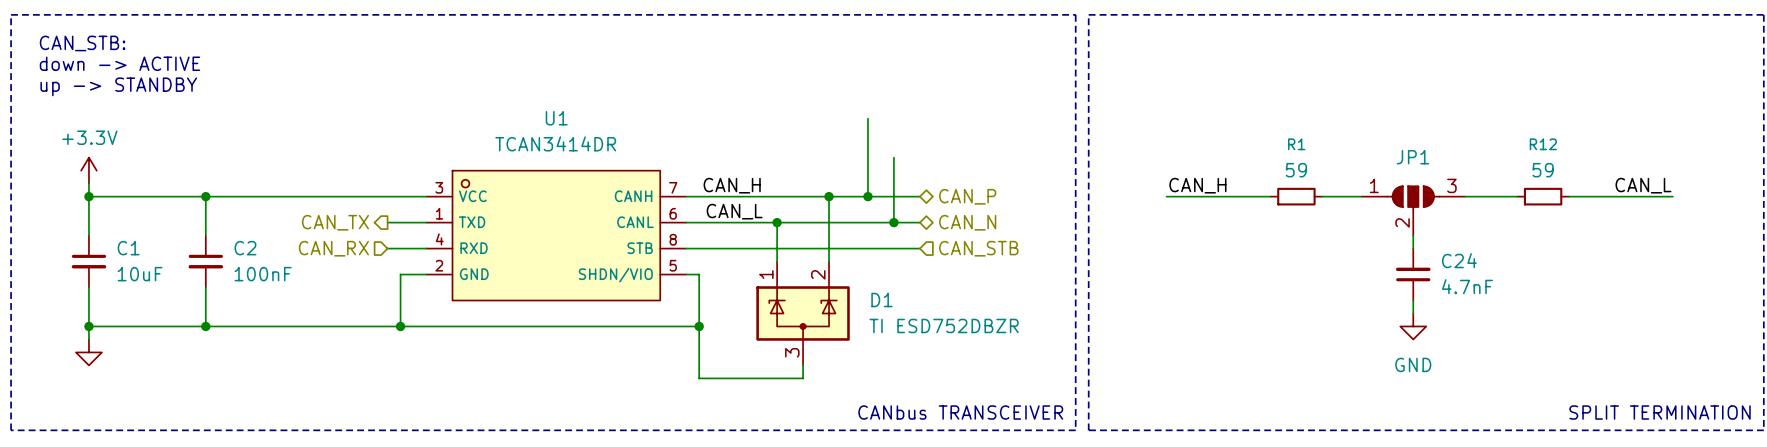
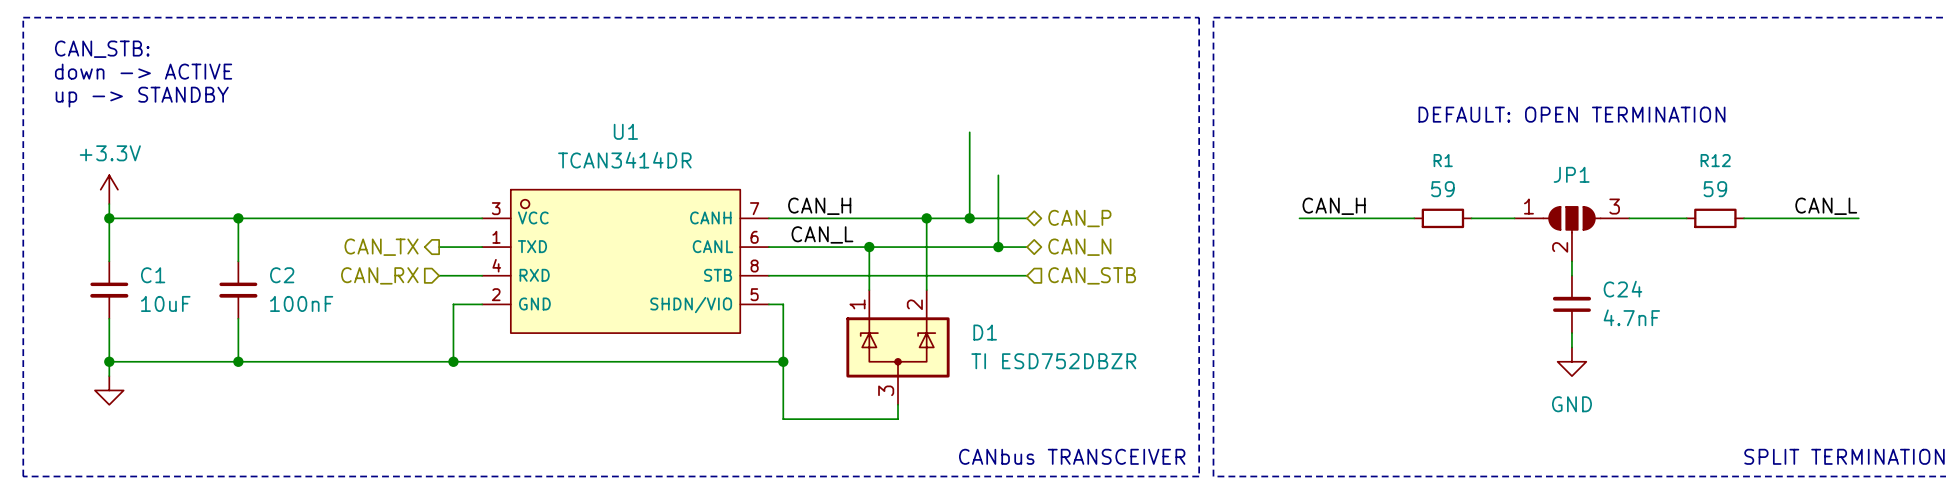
text: none -> DEFAULT: OPEN TERMINATION (1571, 114)

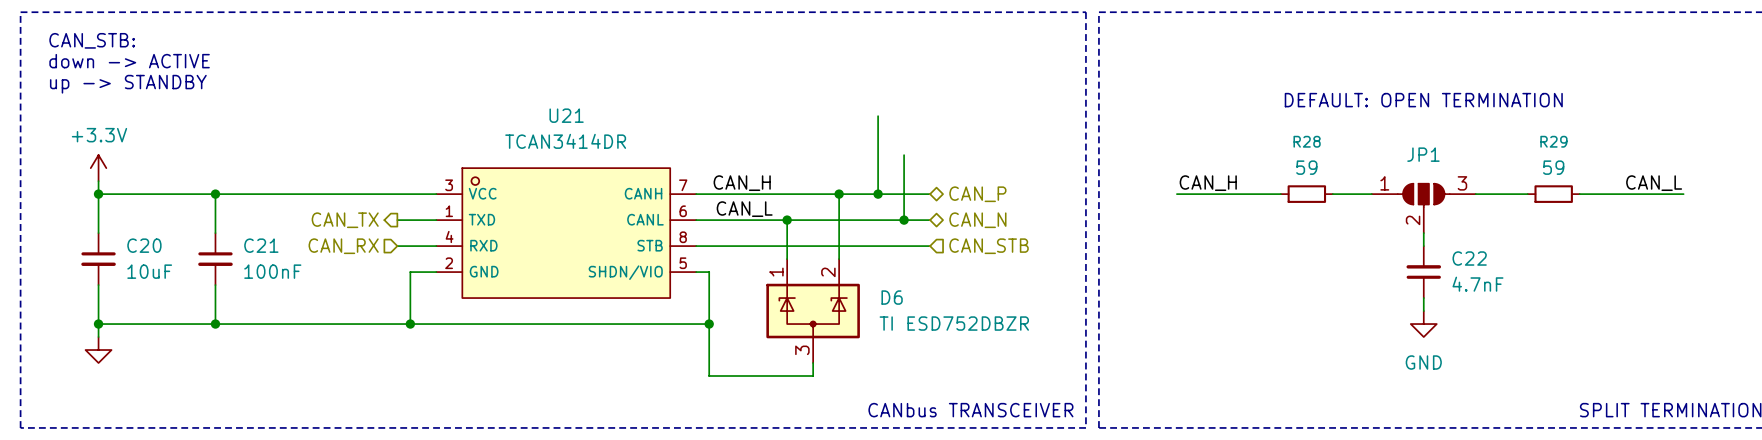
U1 name: U1 (625, 131) -> U21 (566, 115)
R1 name: R1 (1443, 160) -> R28 (1307, 141)
R12 name: R12 (1715, 160) -> R29 (1553, 141)
C1 name: C1 (153, 275) -> C20 (144, 245)
C2 name: C2 (282, 275) -> C21 (261, 245)
C24 name: C24 (1622, 289) -> C22 (1469, 258)
D1 name: D1 (985, 332) -> D6 (892, 297)

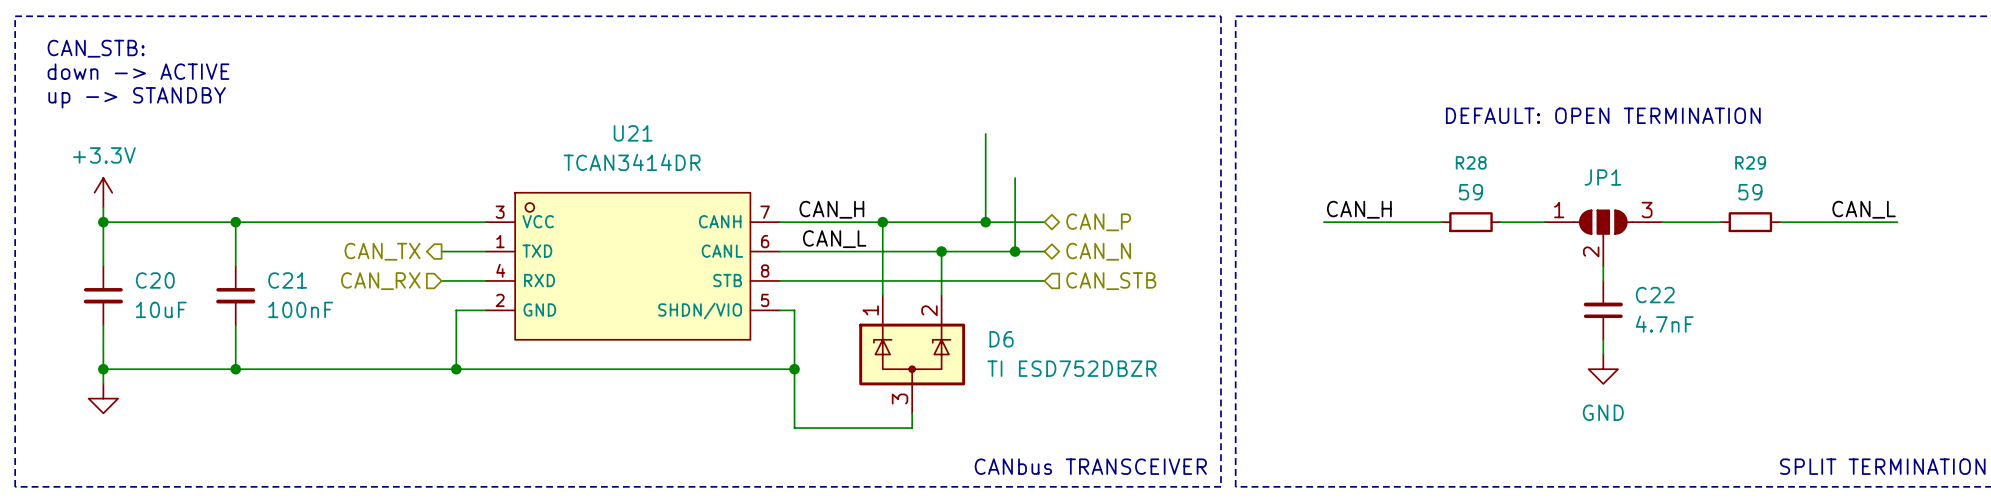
junction: none -> (882, 222)
wire: (839, 194) (839, 220) -> (882, 222) (882, 251)
junction: (839, 194) -> none
junction: (787, 220) -> none
junction: none -> (941, 251)

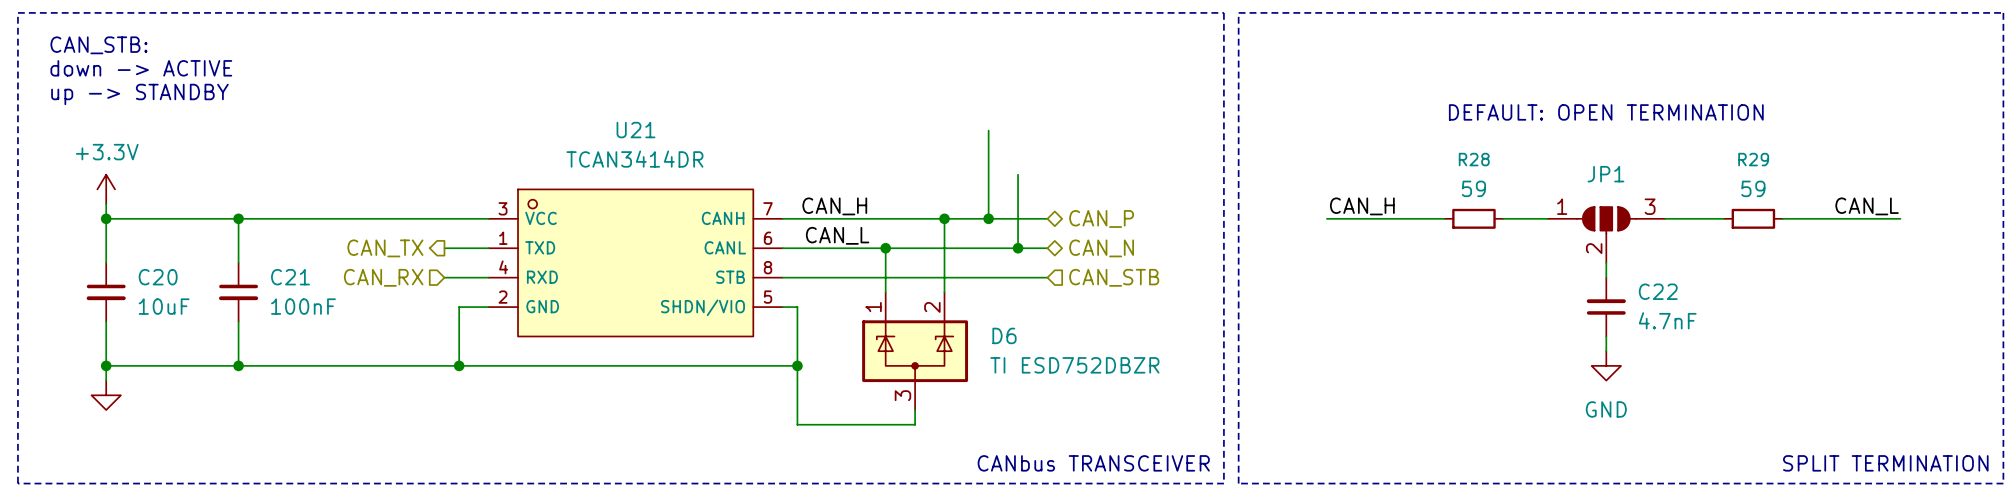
wire: (882, 222) (882, 251) -> (944, 218) (944, 248)
junction: (882, 222) -> none
junction: none -> (944, 218)
junction: none -> (885, 248)
junction: (941, 251) -> none

